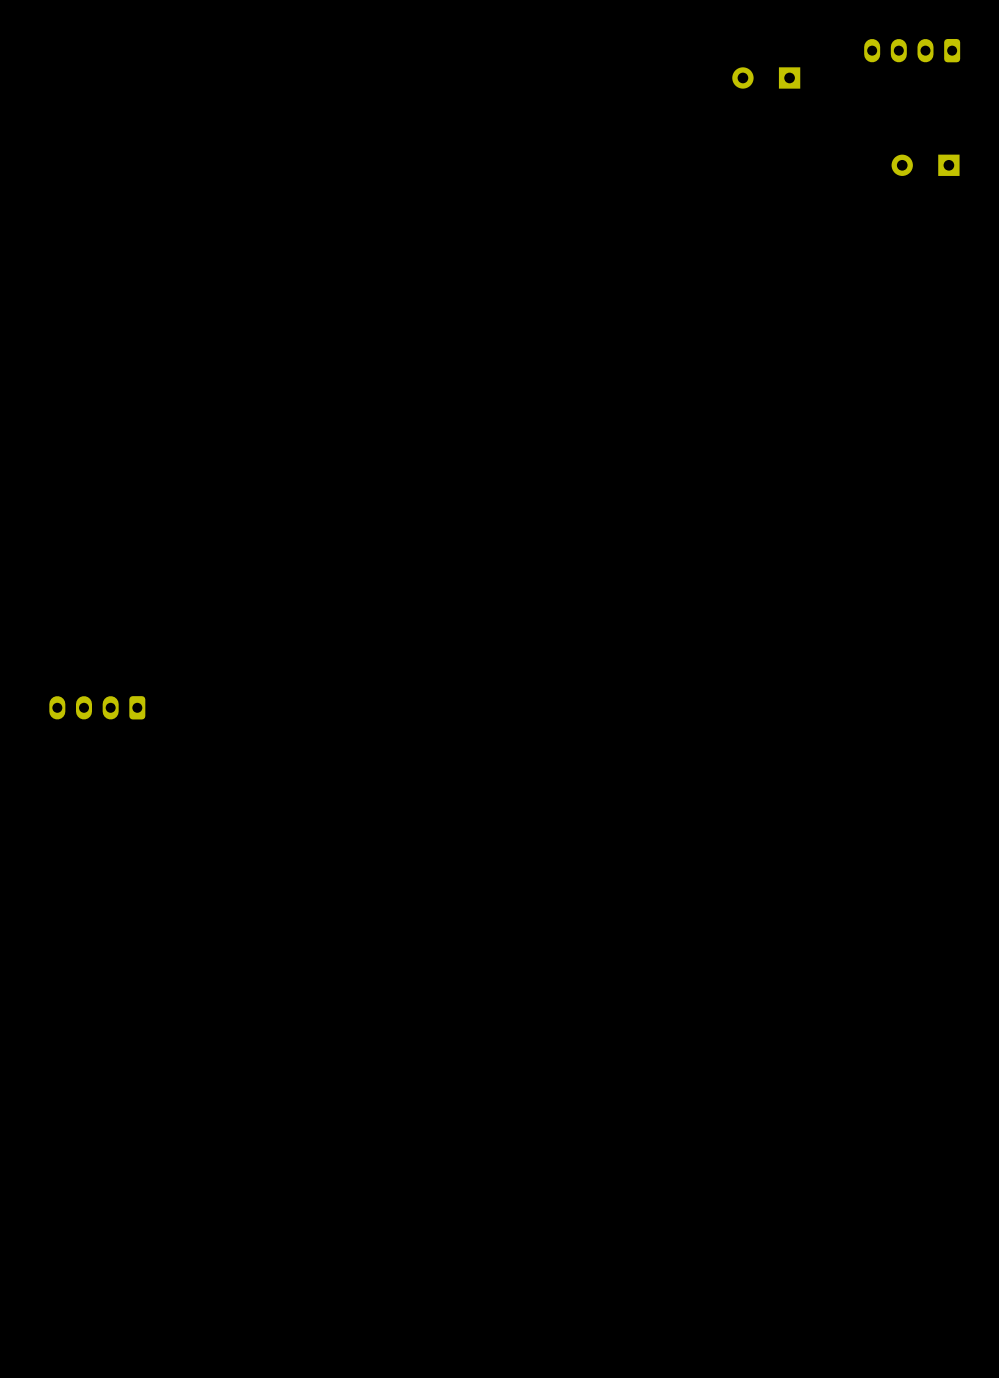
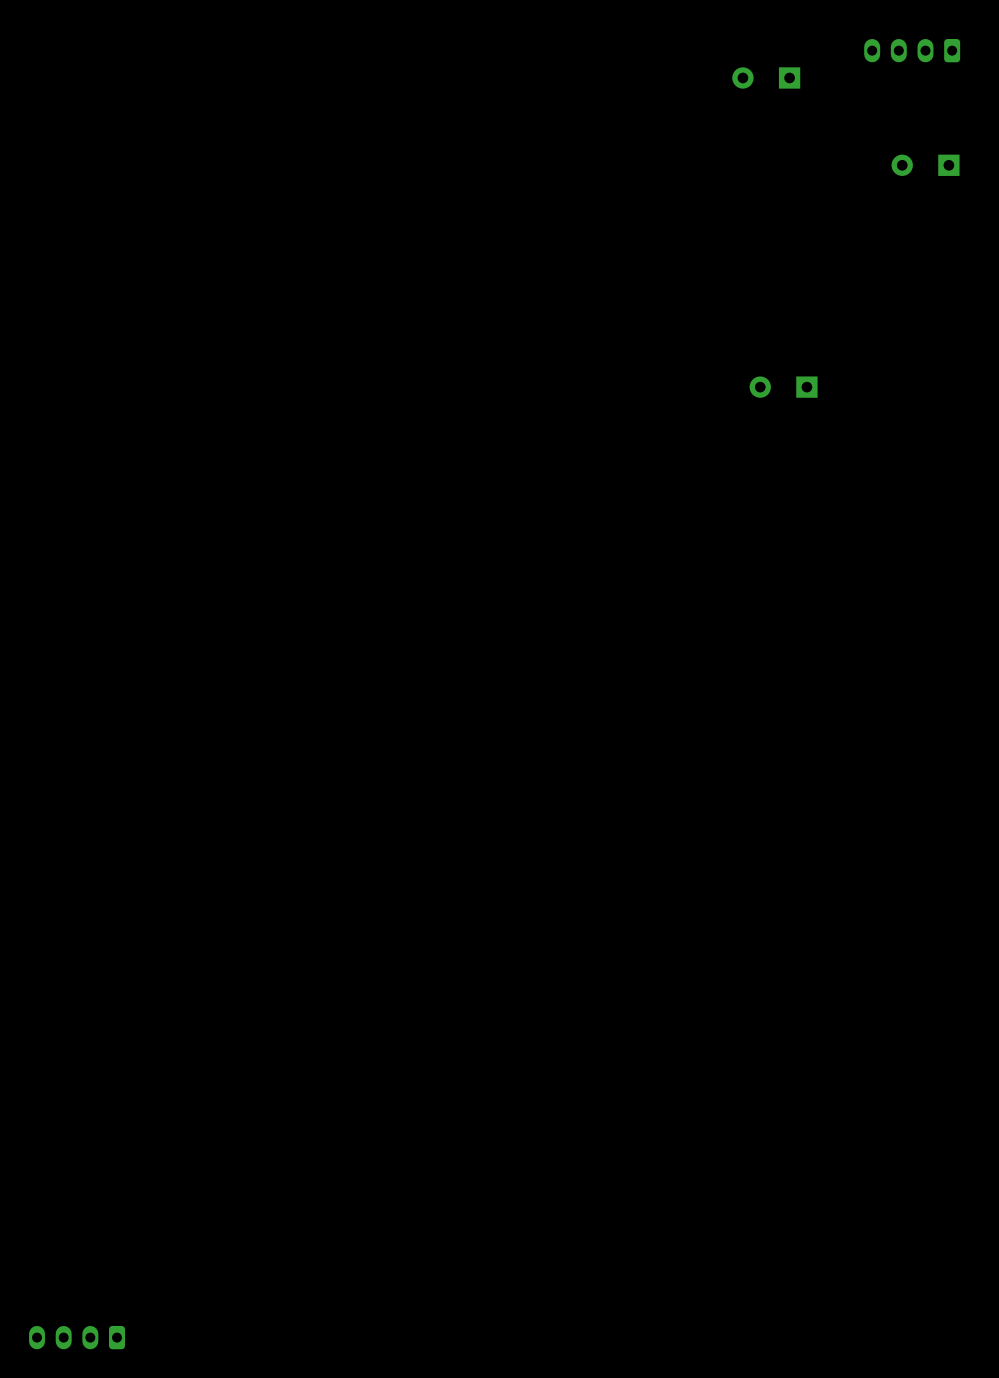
part: none -> (783, 387)
part: (97, 707) -> none
part: none -> (77, 1337)

